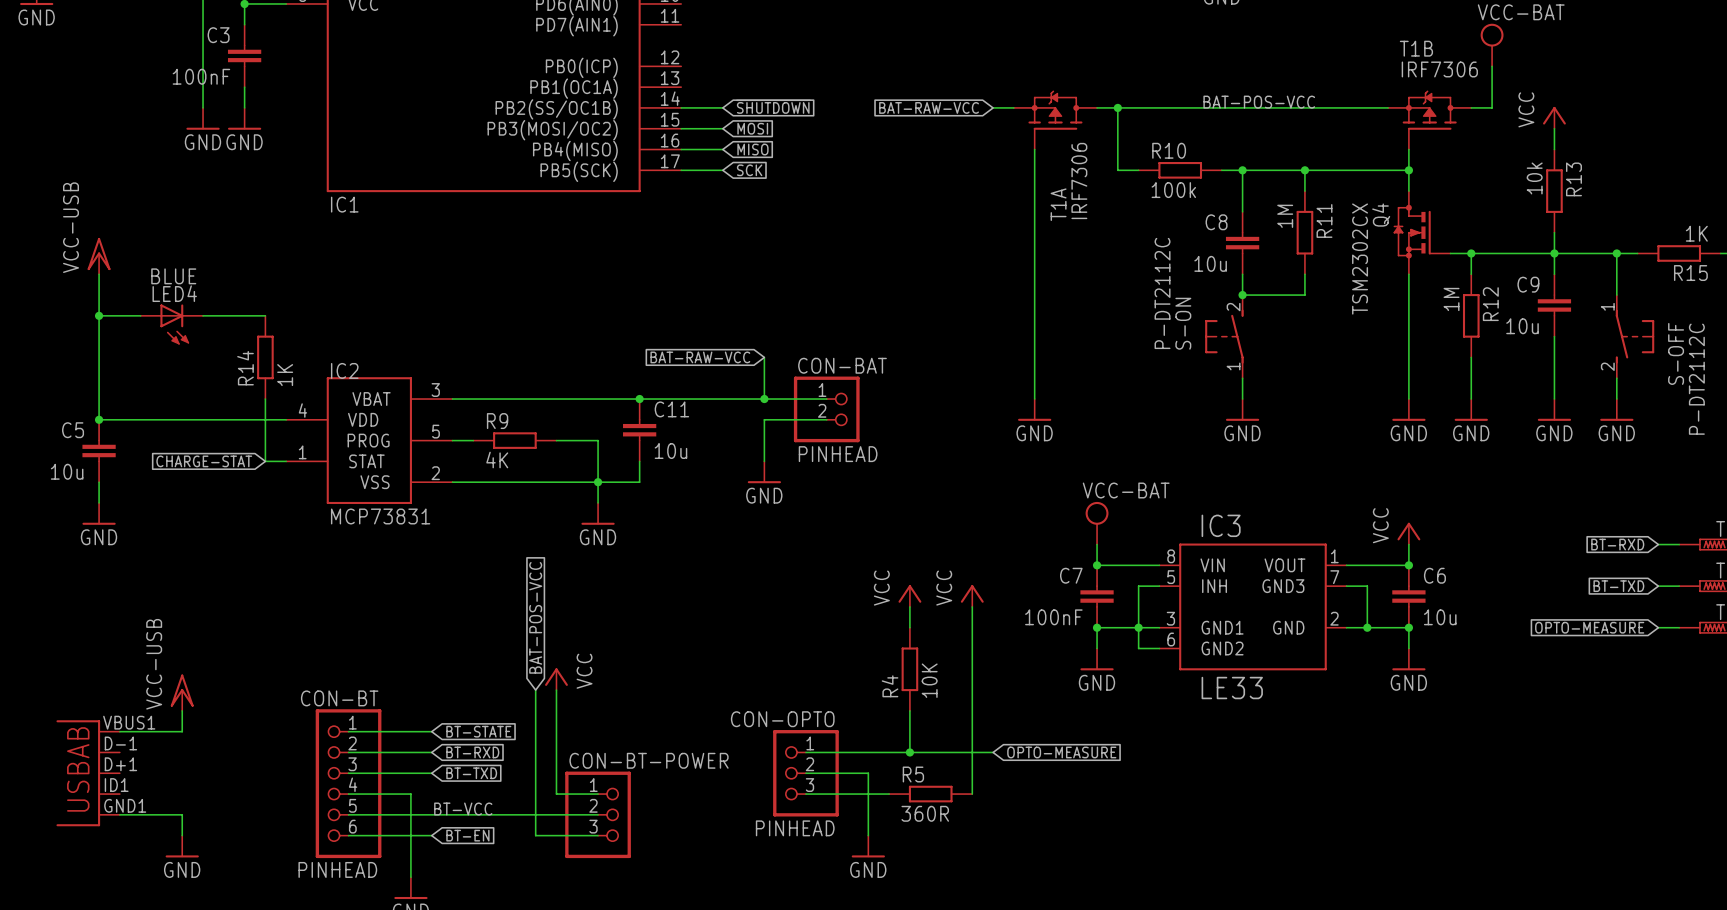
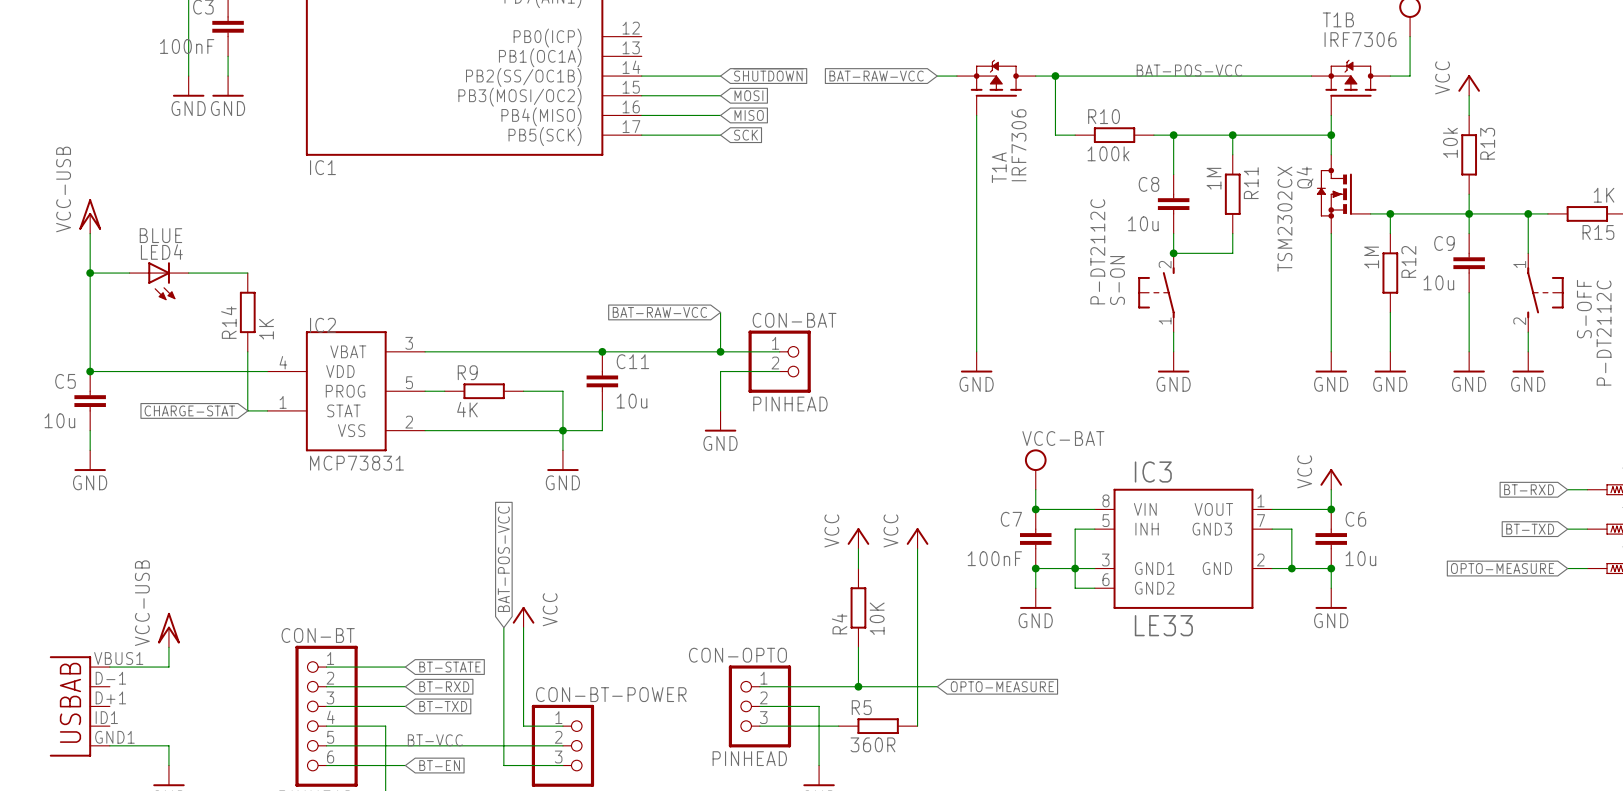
global label position: ~{SHUTDOWN} (773, 106) -> ~{SHUTDOWN} (768, 74)
wire: none -> (681, 76) (720, 76)
wire: none -> (681, 95) (720, 95)
global label position: MOSI (752, 128) -> MOSI (748, 95)
wire: none -> (681, 115) (720, 115)
global label position: MISO (752, 149) -> MISO (749, 115)
wire: none -> (681, 135) (720, 135)
global label position: SCK (749, 170) -> SCK (745, 135)

